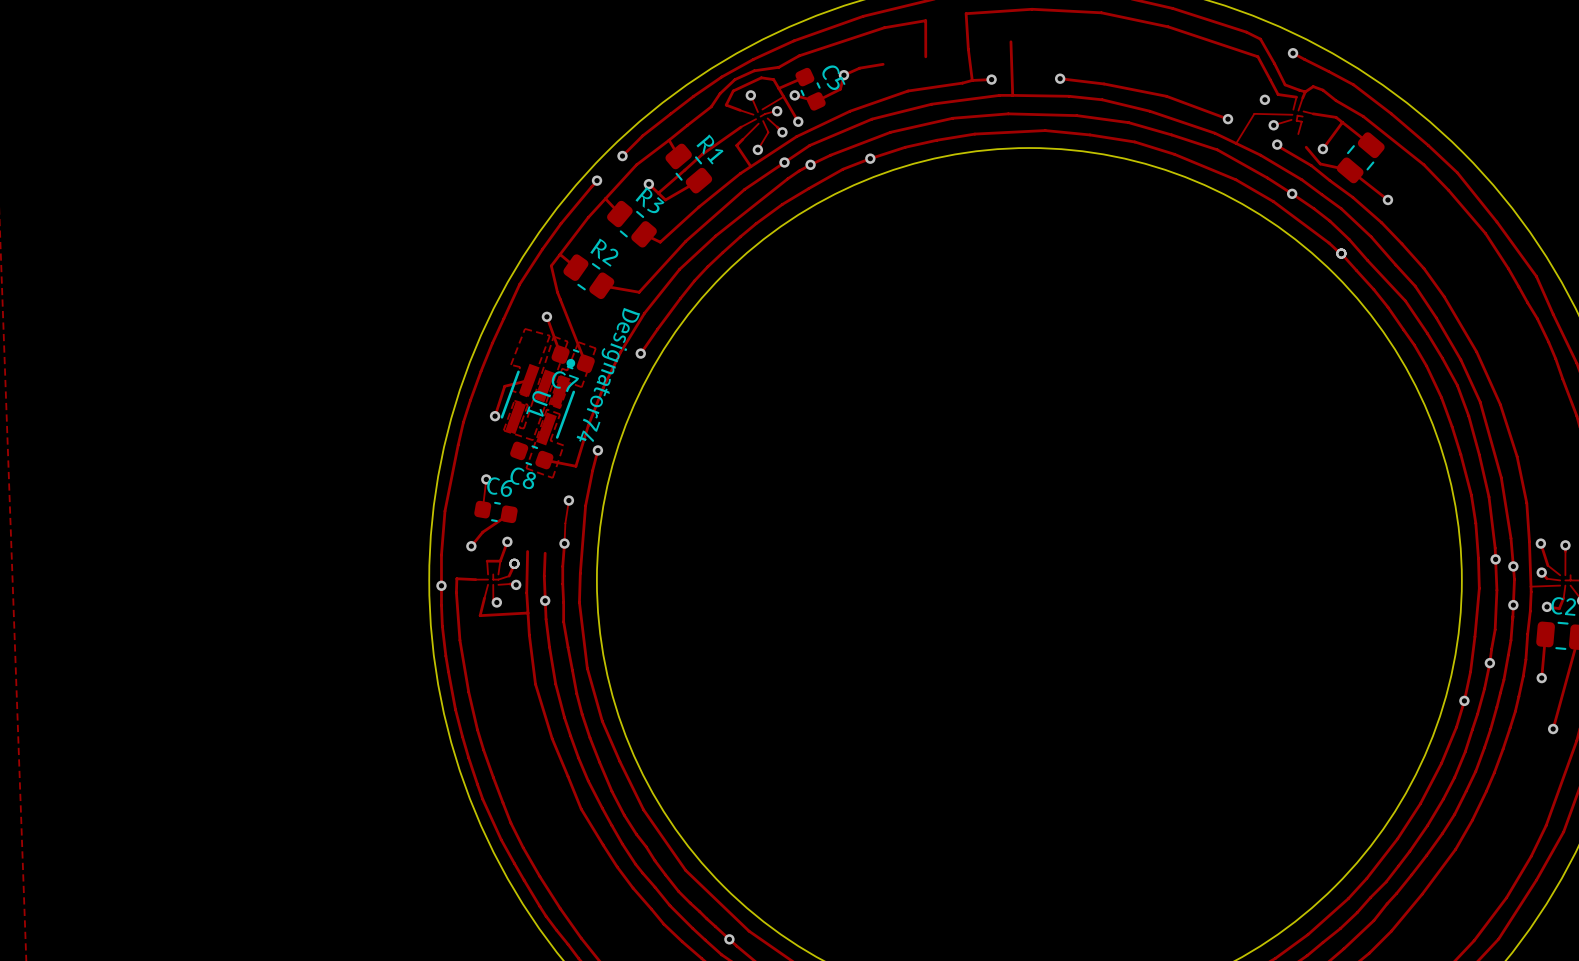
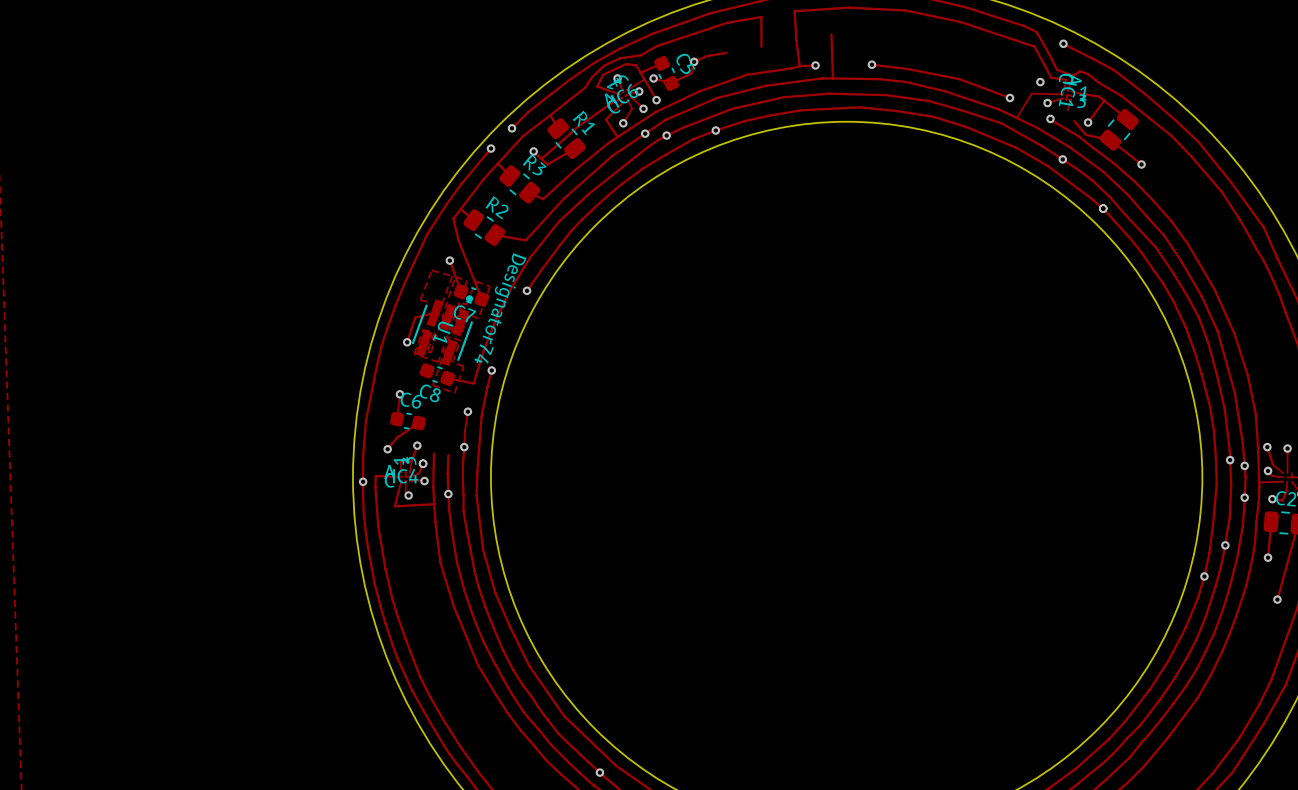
IC1: none -> (1067, 95)
IC6: none -> (625, 95)
IC4: none -> (405, 476)

